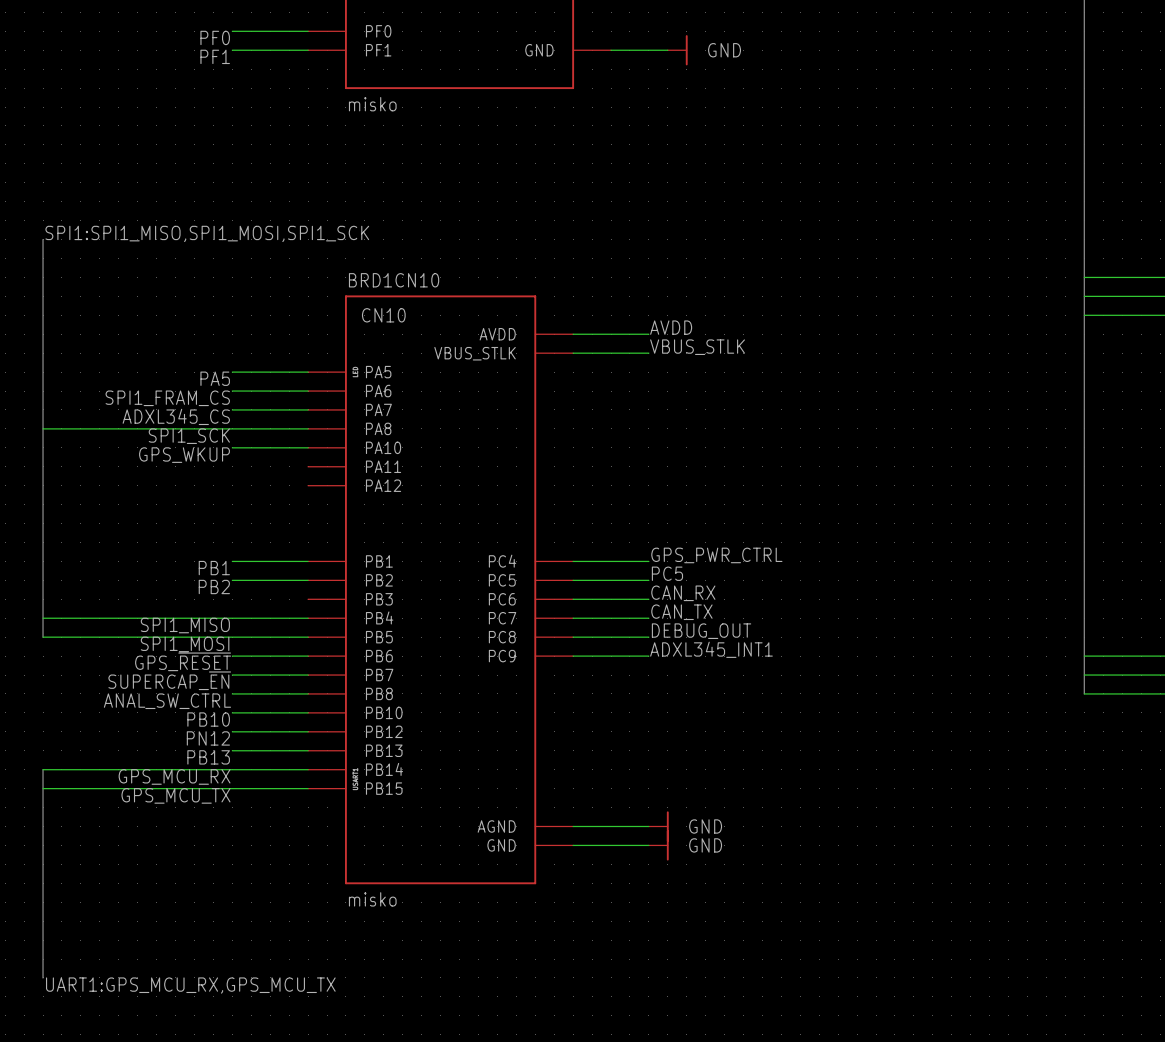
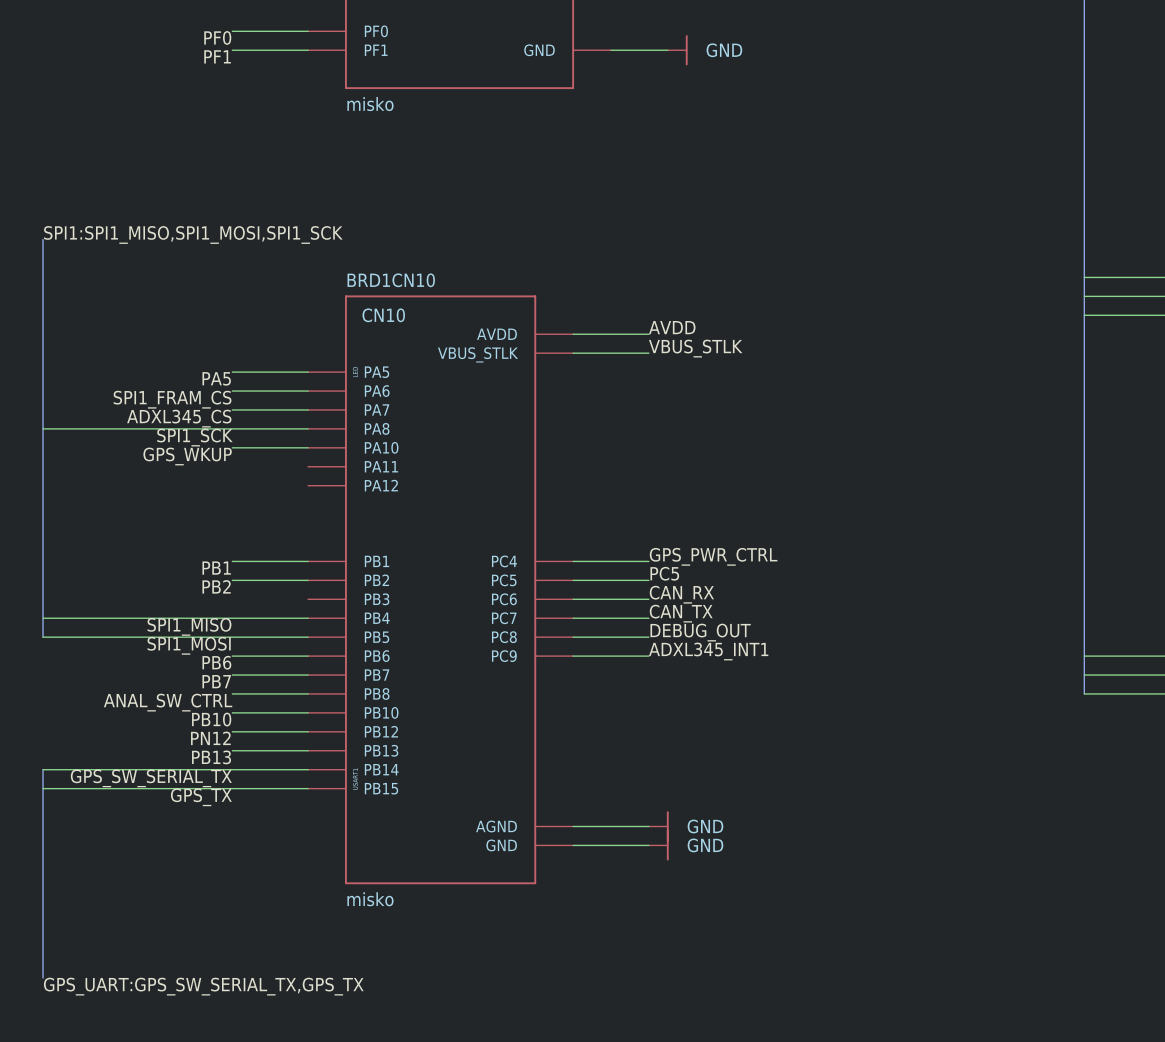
label: GPS_~{RESET} (183, 661) -> PB6 (216, 662)
label: SUPERCAP_~{EN} (169, 680) -> PB7 (216, 681)
label: GPS_MCU_RX (174, 776) -> GPS_SW_SERIAL_TX (151, 778)
label: GPS_MCU_TX (175, 795) -> GPS_TX (201, 797)
label: UART1:GPS_MCU_RX,GPS_MCU_TX (190, 985) -> GPS_UART:GPS_SW_SERIAL_TX,GPS_TX (203, 986)

